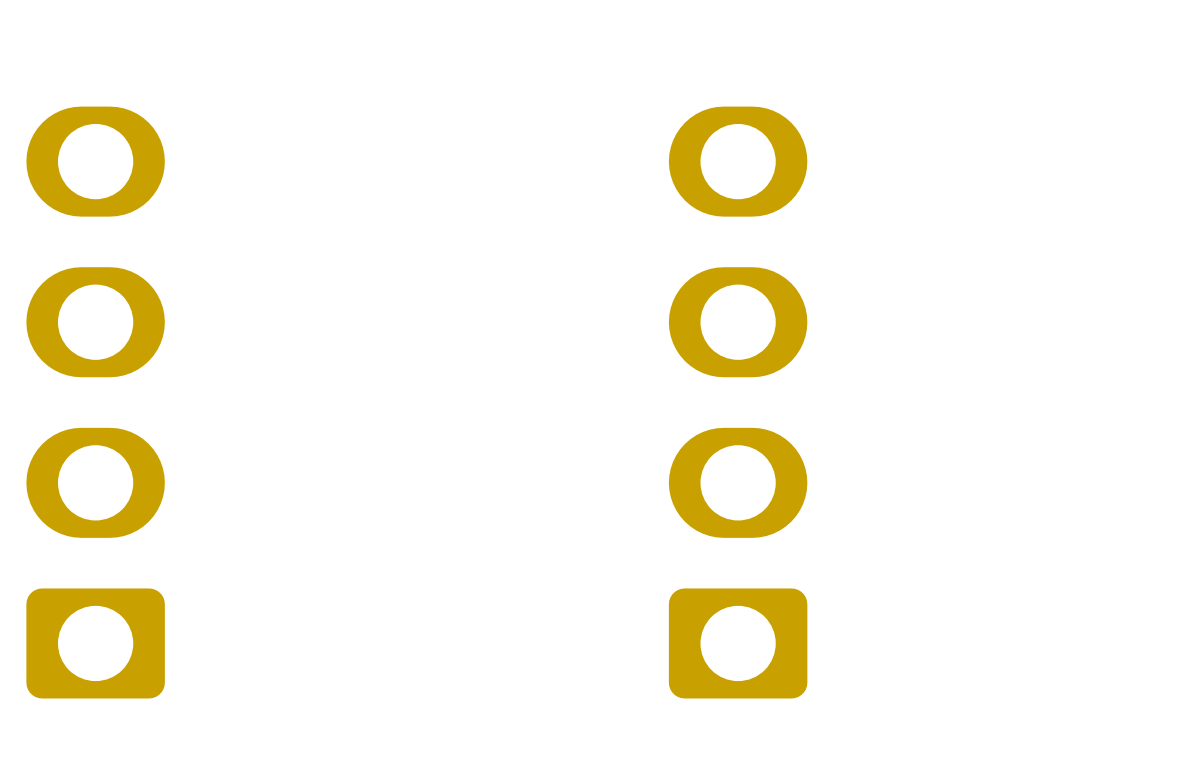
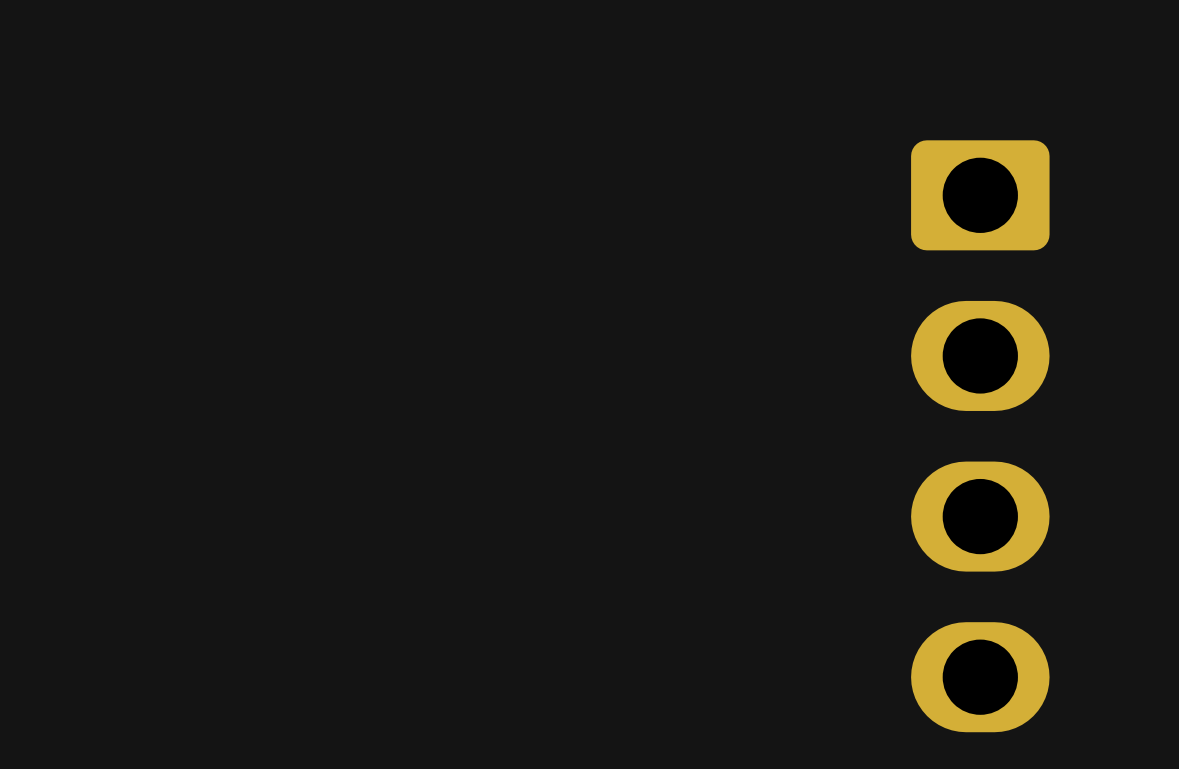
part: (95, 402) -> none
part rotation: 0° (738, 402) -> 180° (980, 436)

